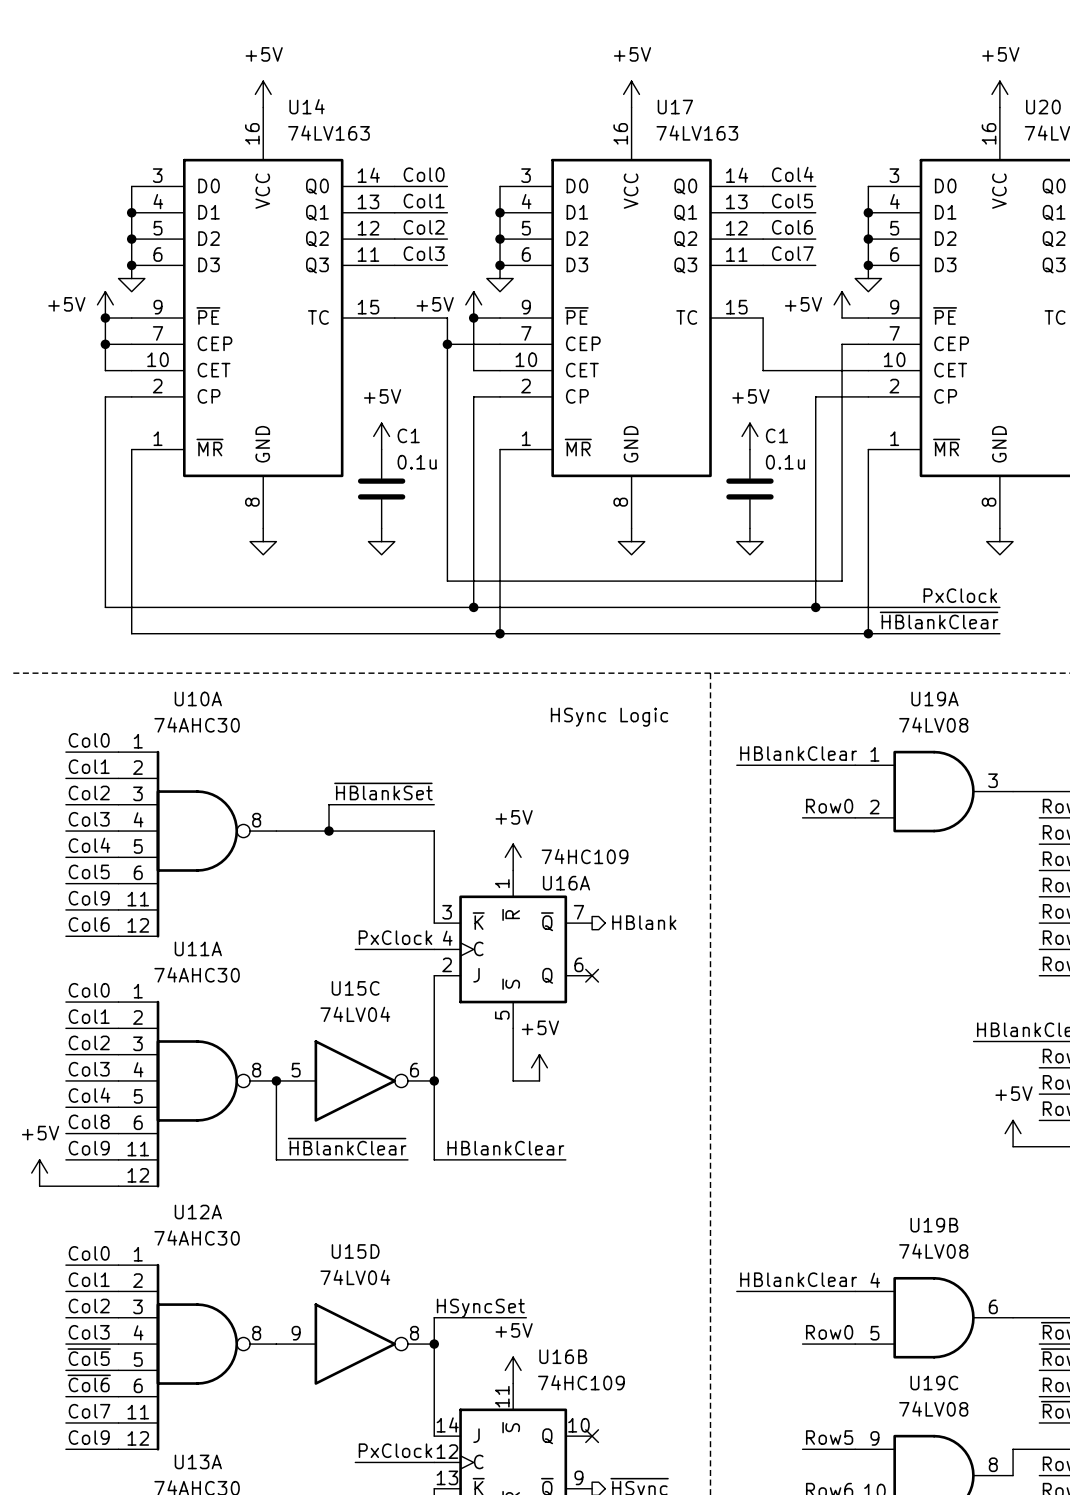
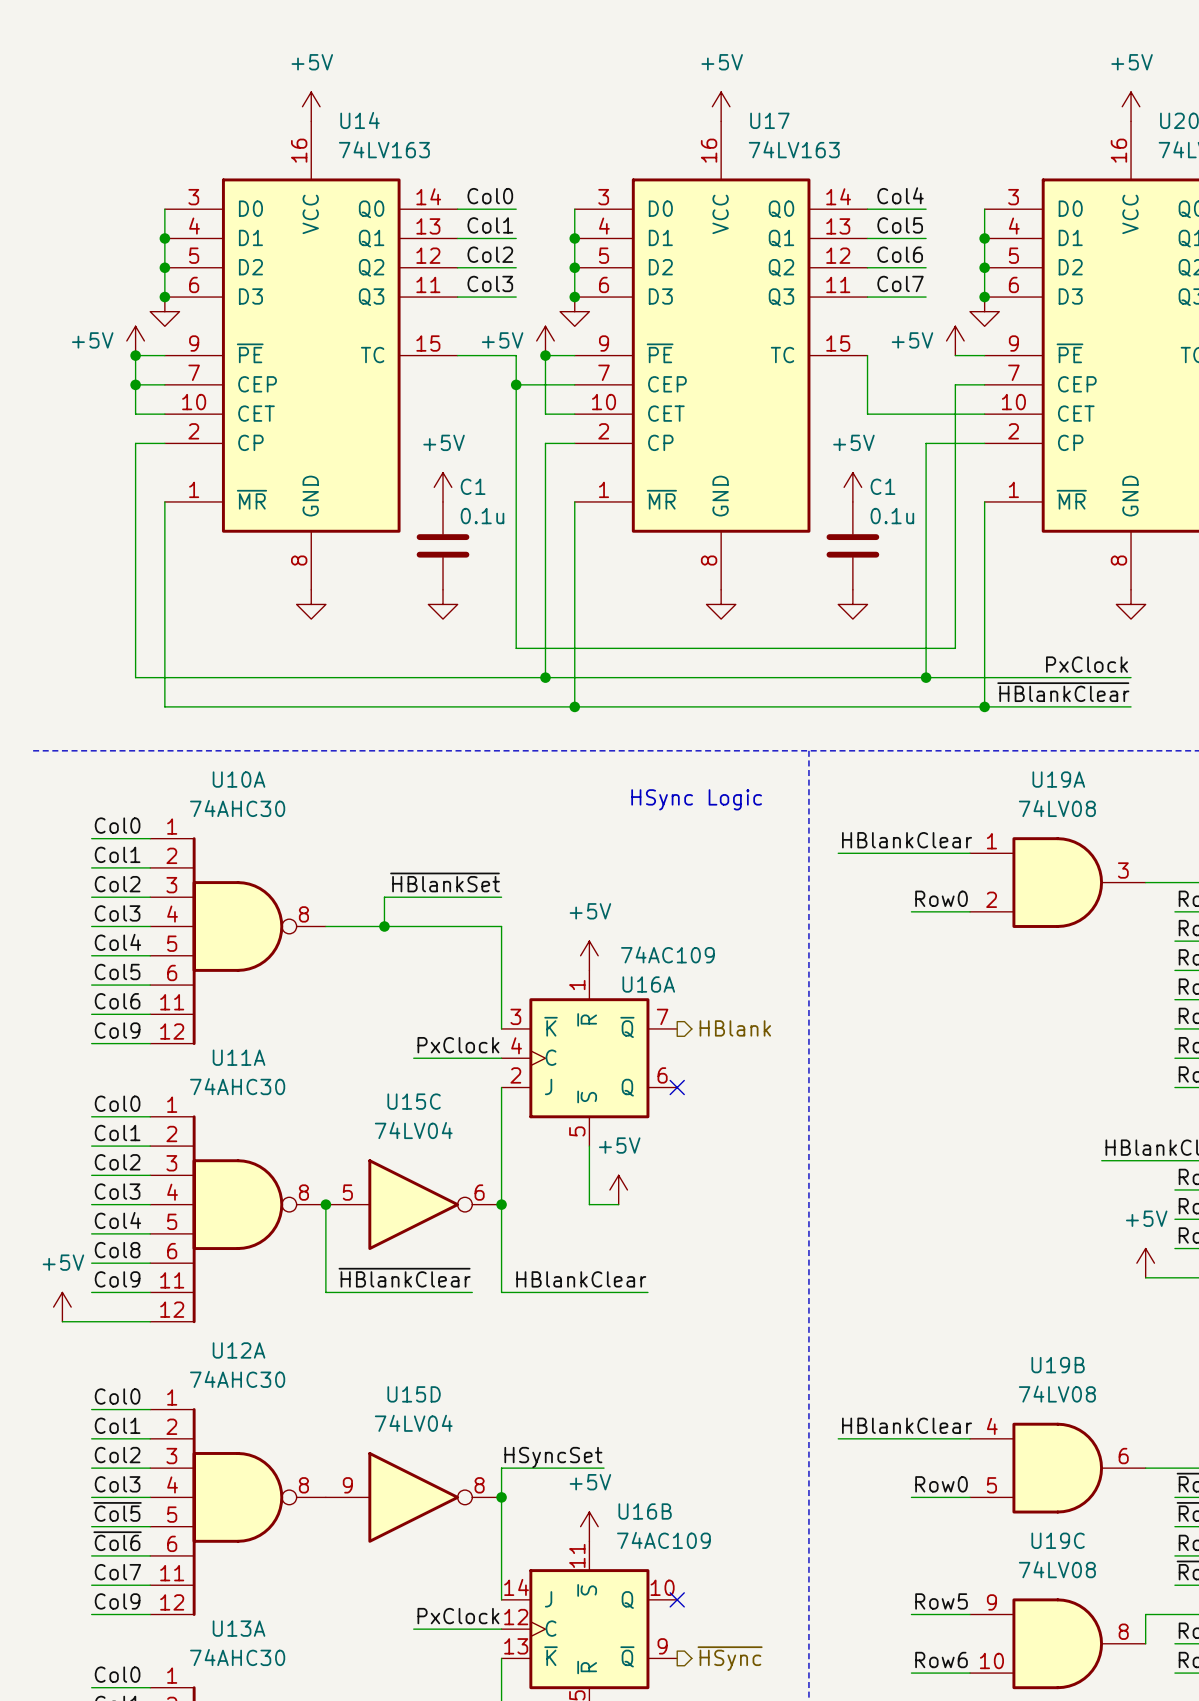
U16A value: 74HC109 (585, 856) -> 74AC109 (667, 954)
label: Col9 (89, 898) -> Col6 (117, 1001)
label: Col6 (89, 924) -> Col9 (117, 1030)
U16B value: 74HC109 (581, 1382) -> 74AC109 (663, 1540)

